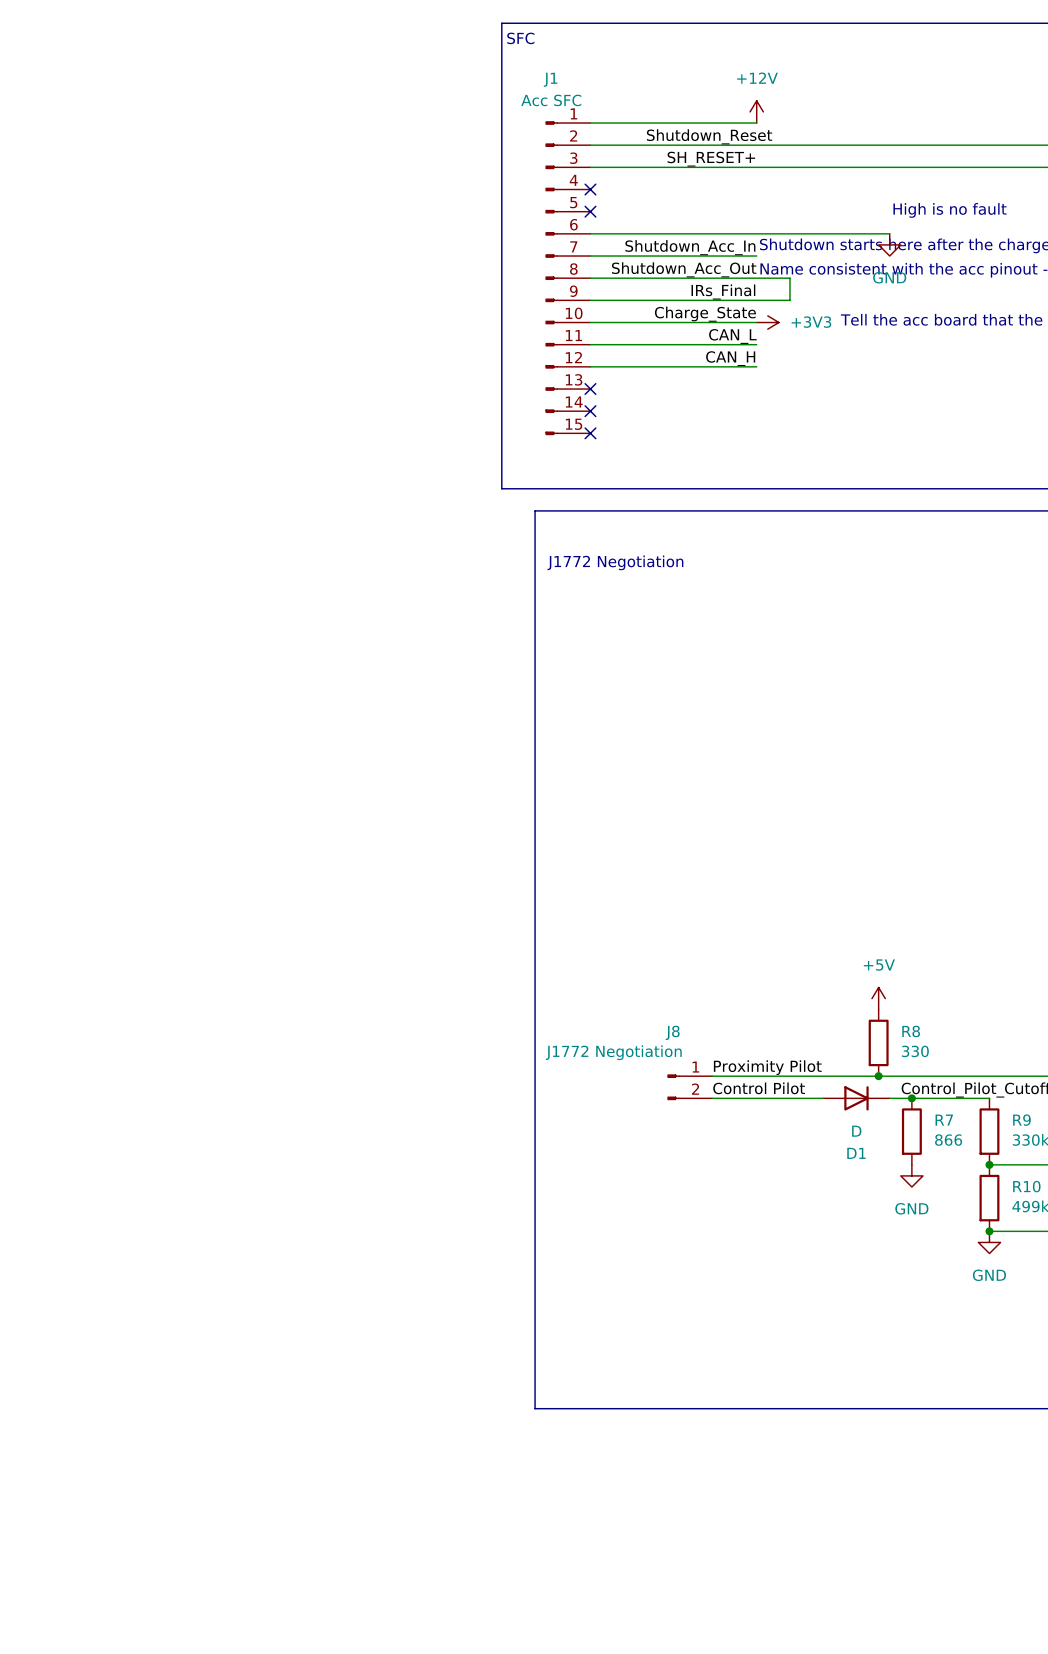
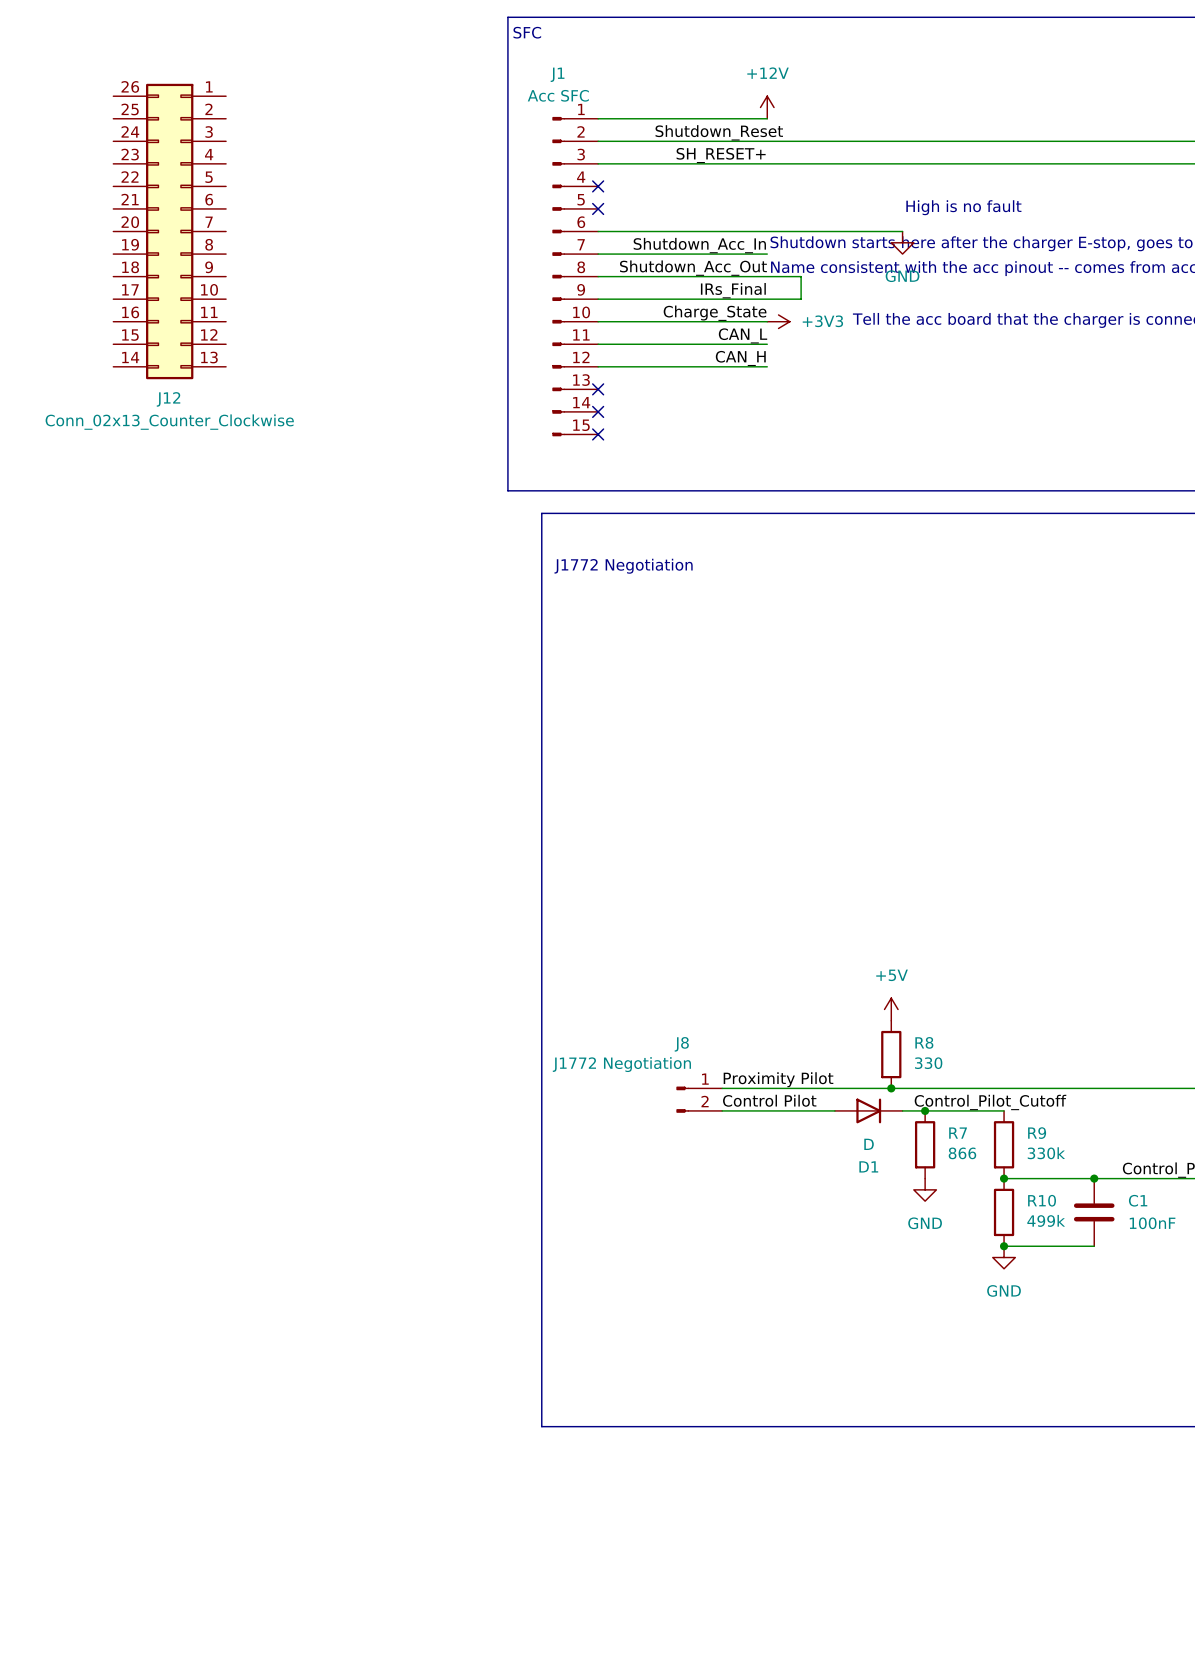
J12: none -> Conn_02x13_Counter_Clockwise (169, 231)

